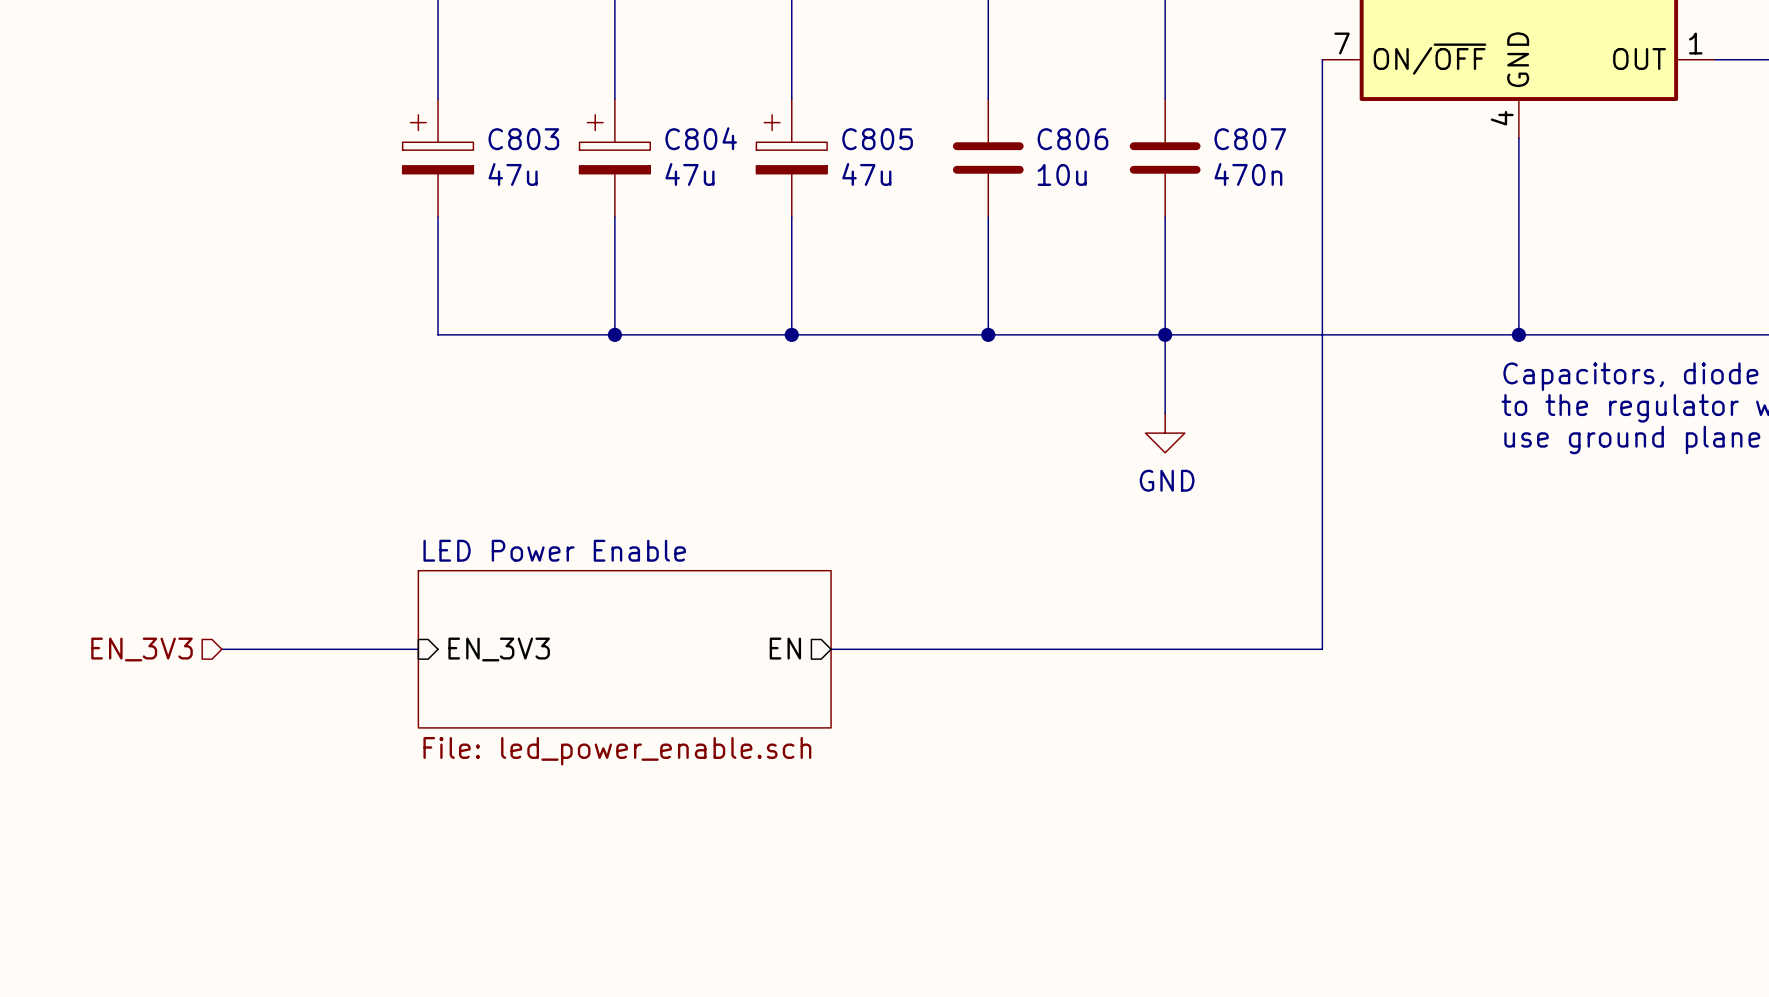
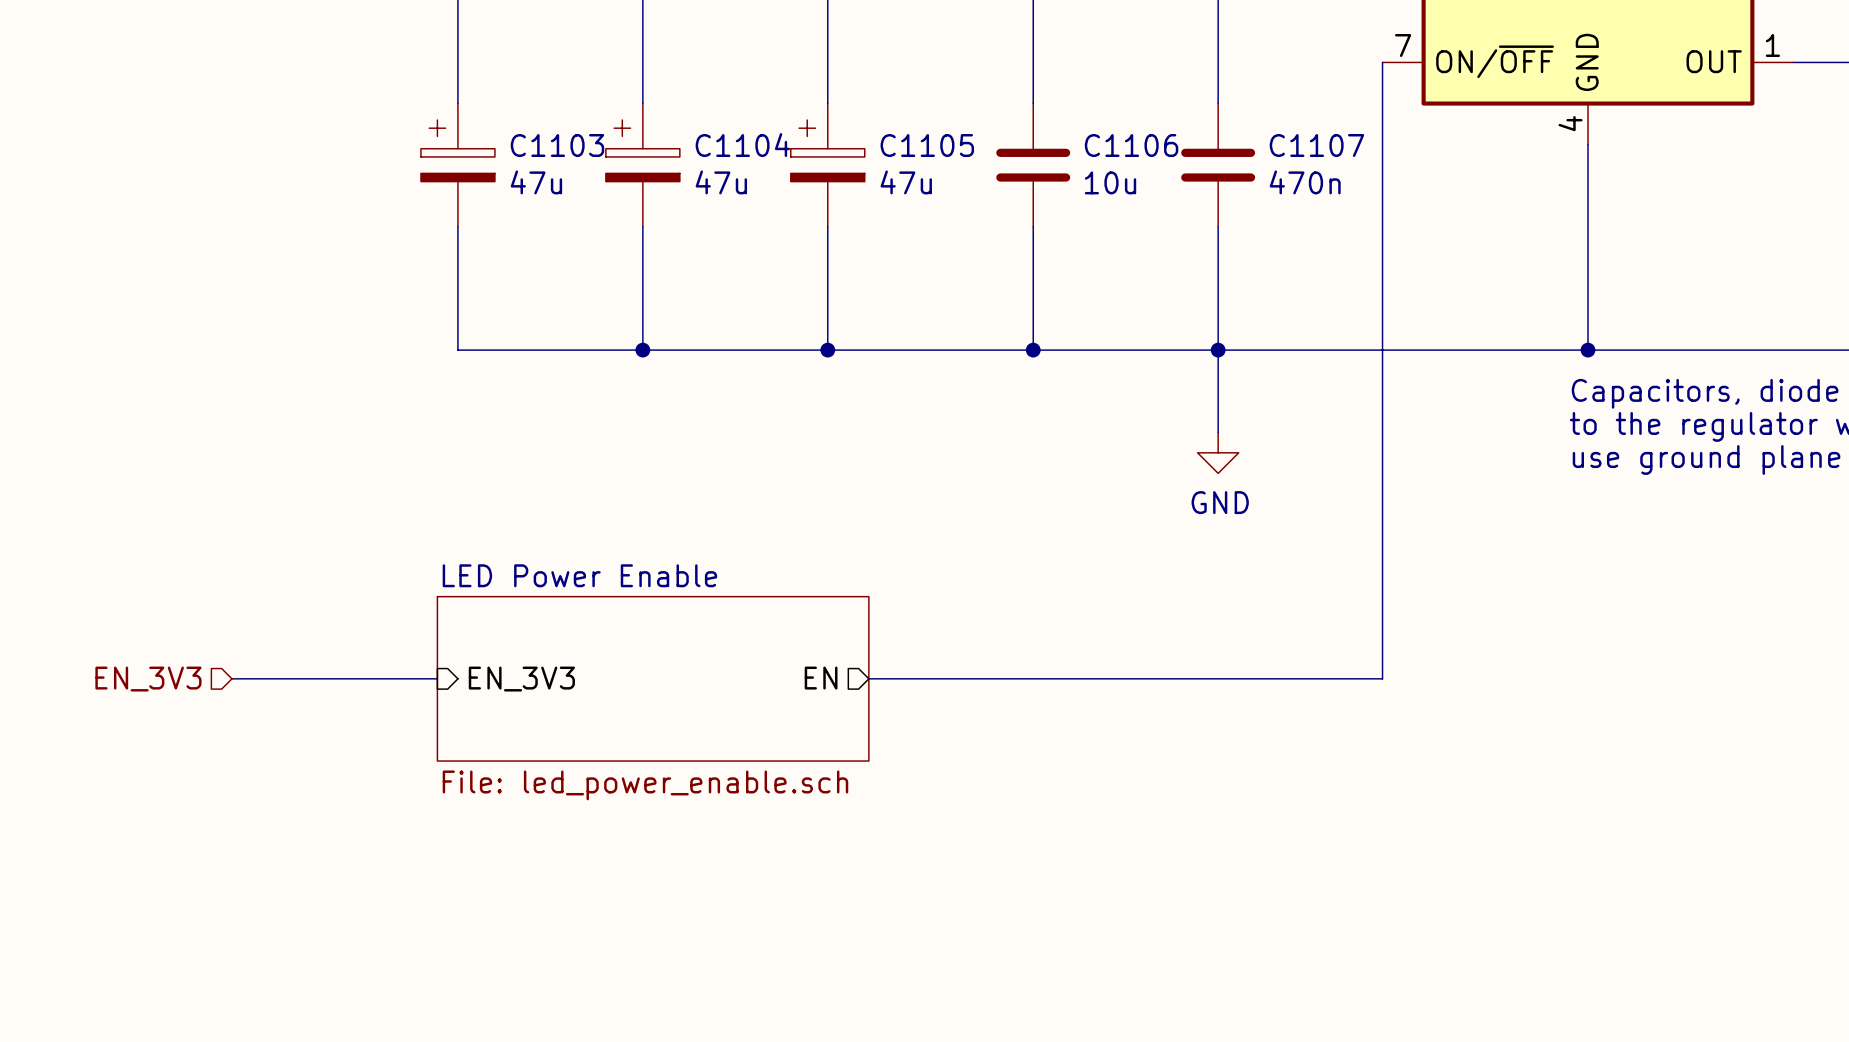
C804 name: C804 (701, 138) -> C1104 (742, 145)
C803 name: C803 (523, 139) -> C1103 (557, 145)
C805 name: C805 (877, 139) -> C1105 (927, 145)
C806 name: C806 (1072, 139) -> C1106 (1131, 145)
C807 name: C807 (1250, 139) -> C1107 (1316, 145)

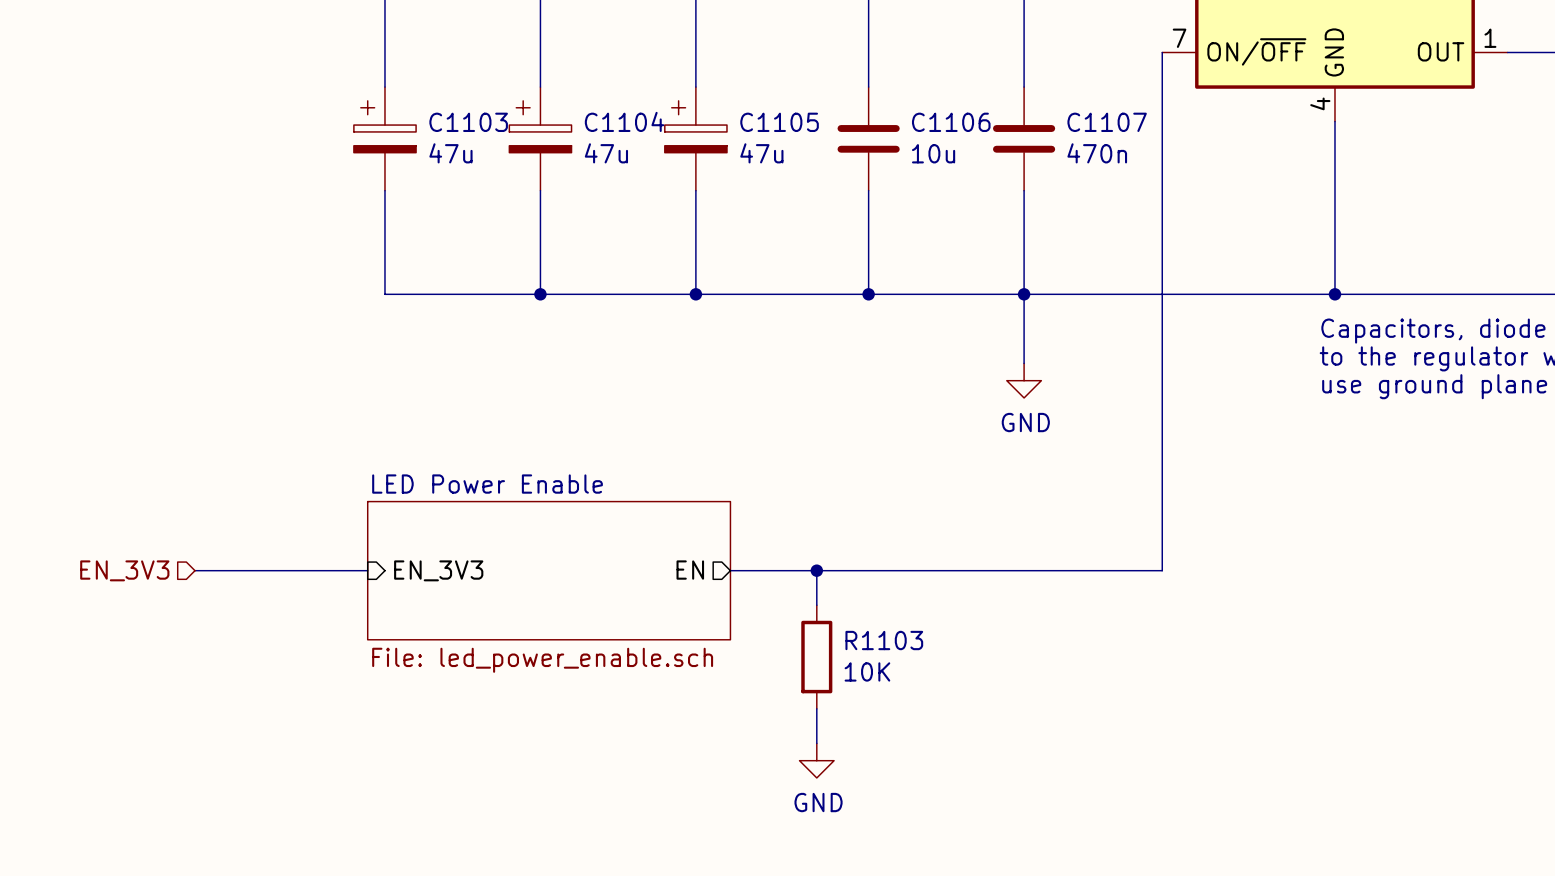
wire: none -> (816, 570) (816, 605)
junction: none -> (816, 570)
R1103: none -> 10K (816, 657)
wire: none -> (816, 708) (816, 743)
power symbol: none -> GND (816, 760)

